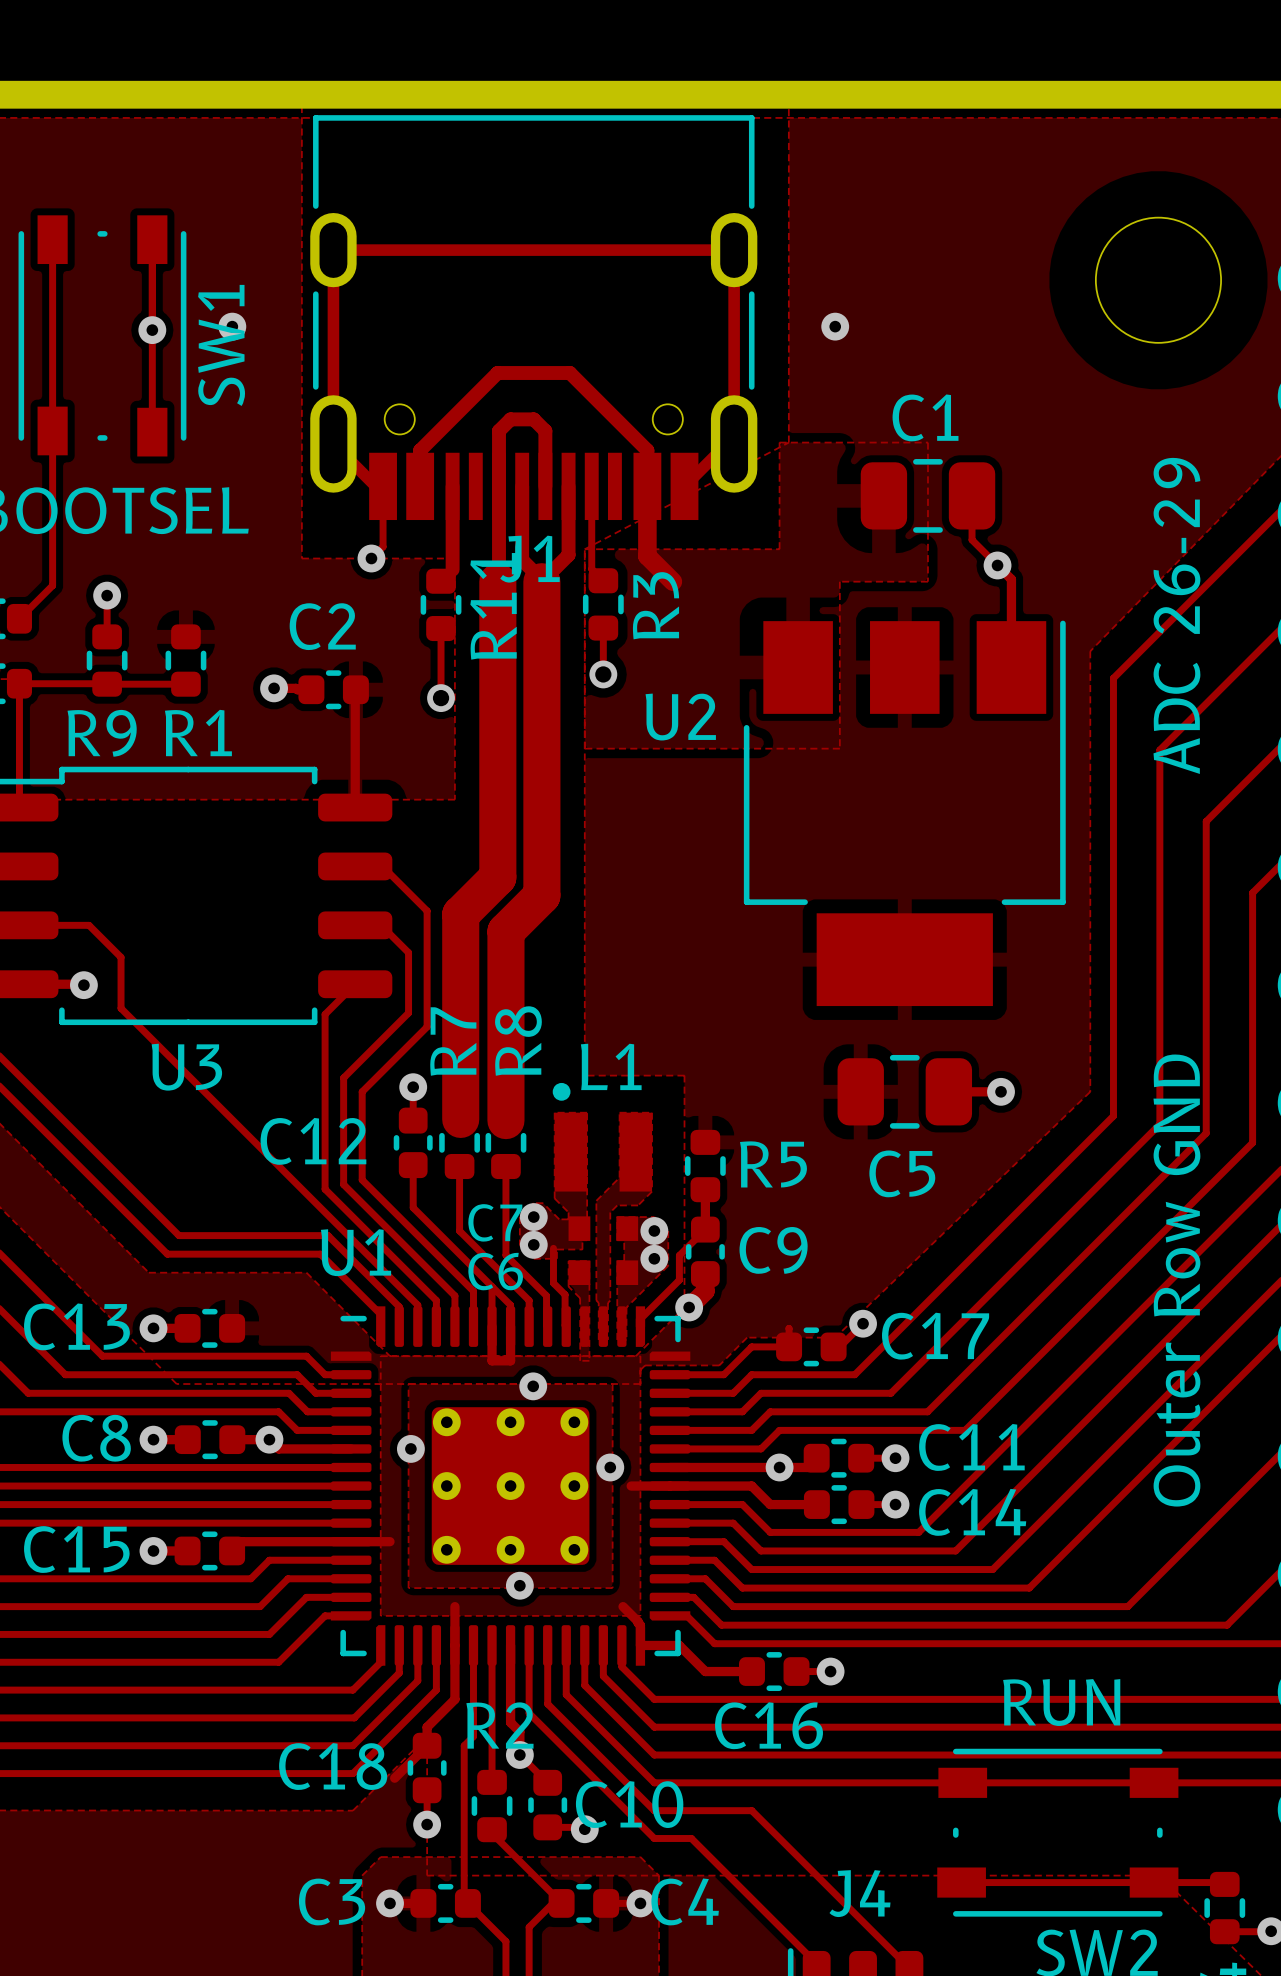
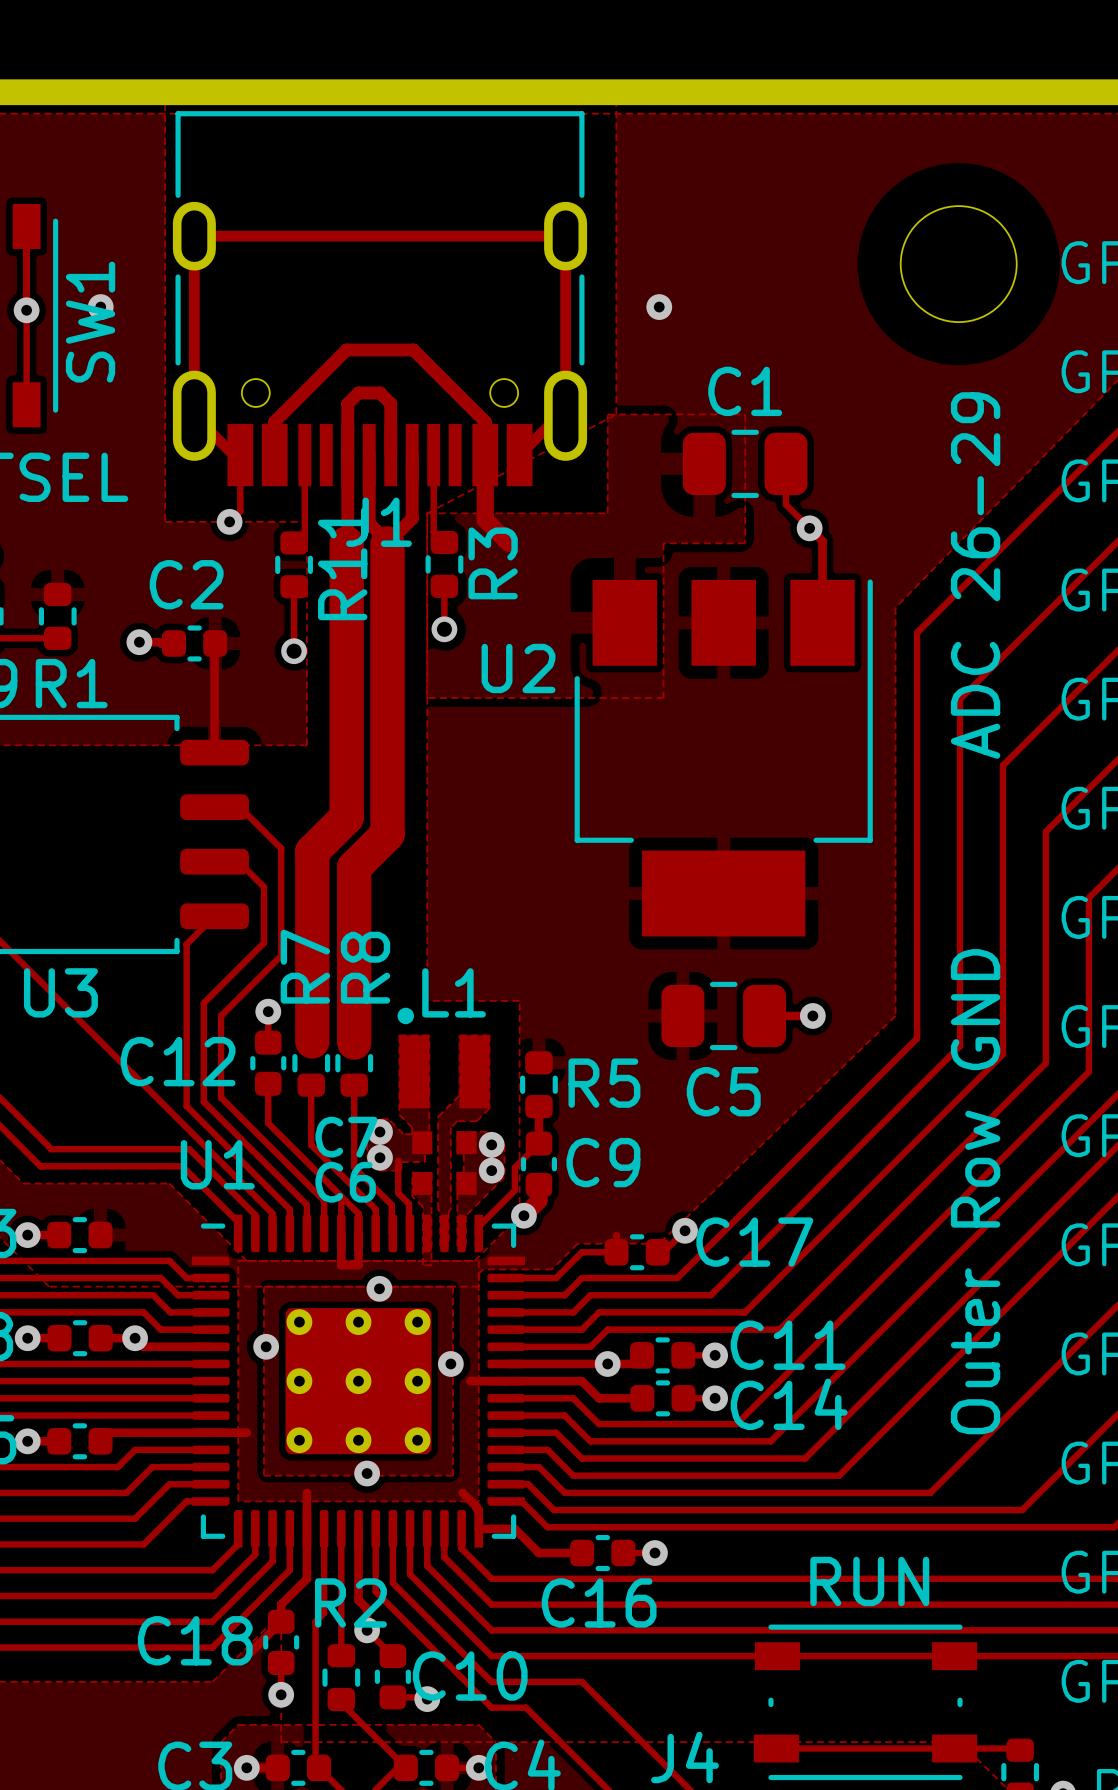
track width: thick (452, 486) (452, 569) -> thin (304, 455) (304, 532)

